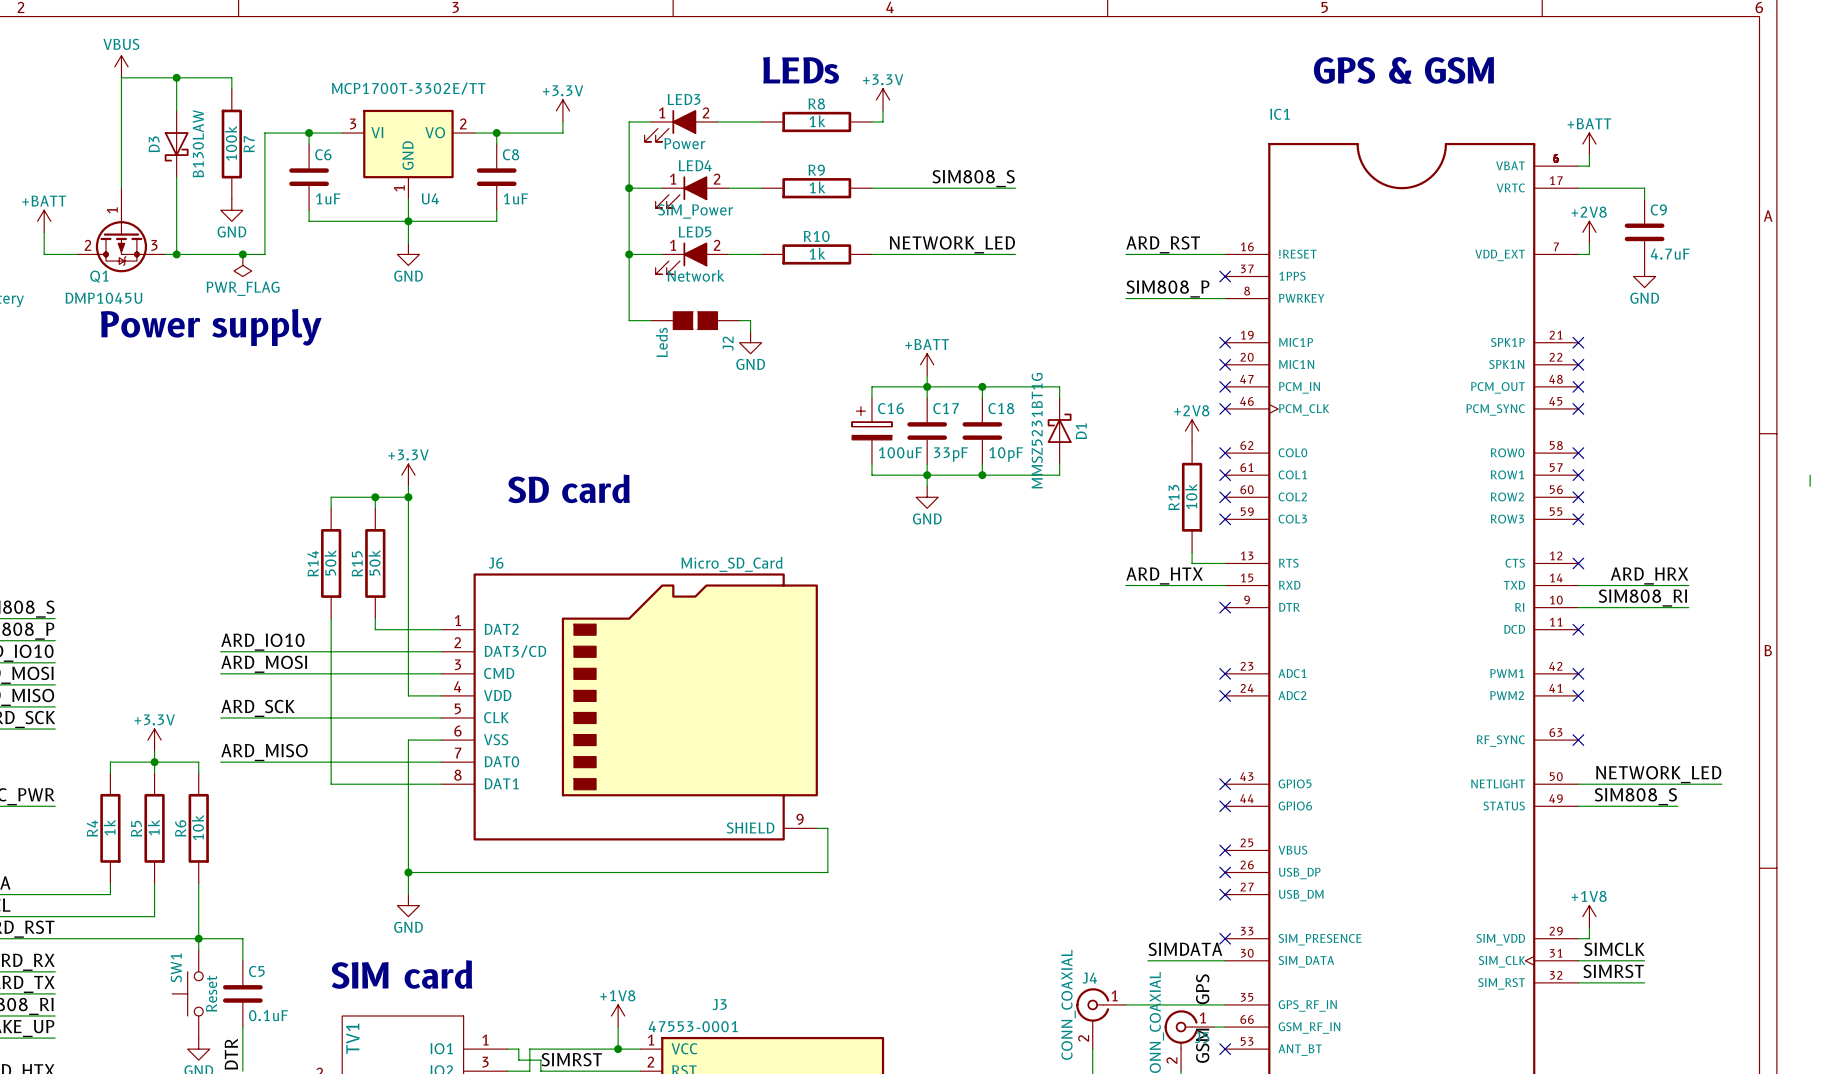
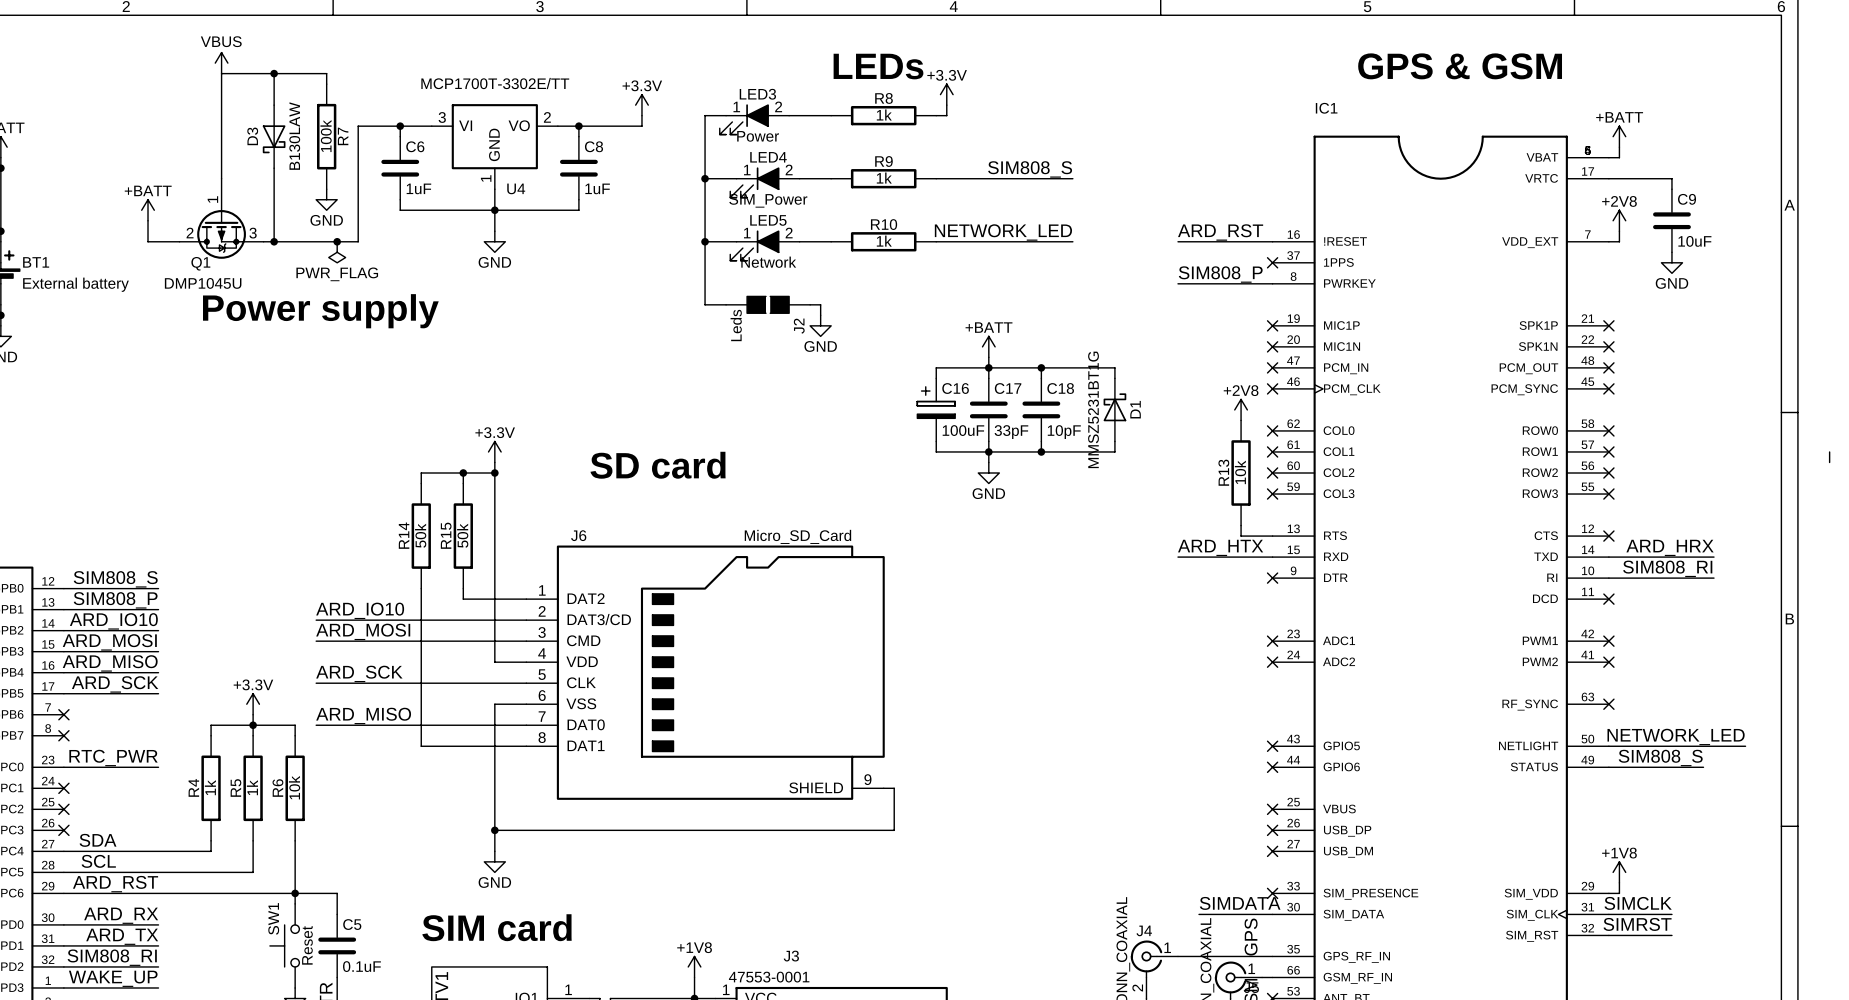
C9 value: 4.7uF (1670, 254) -> 10uF (1694, 241)

